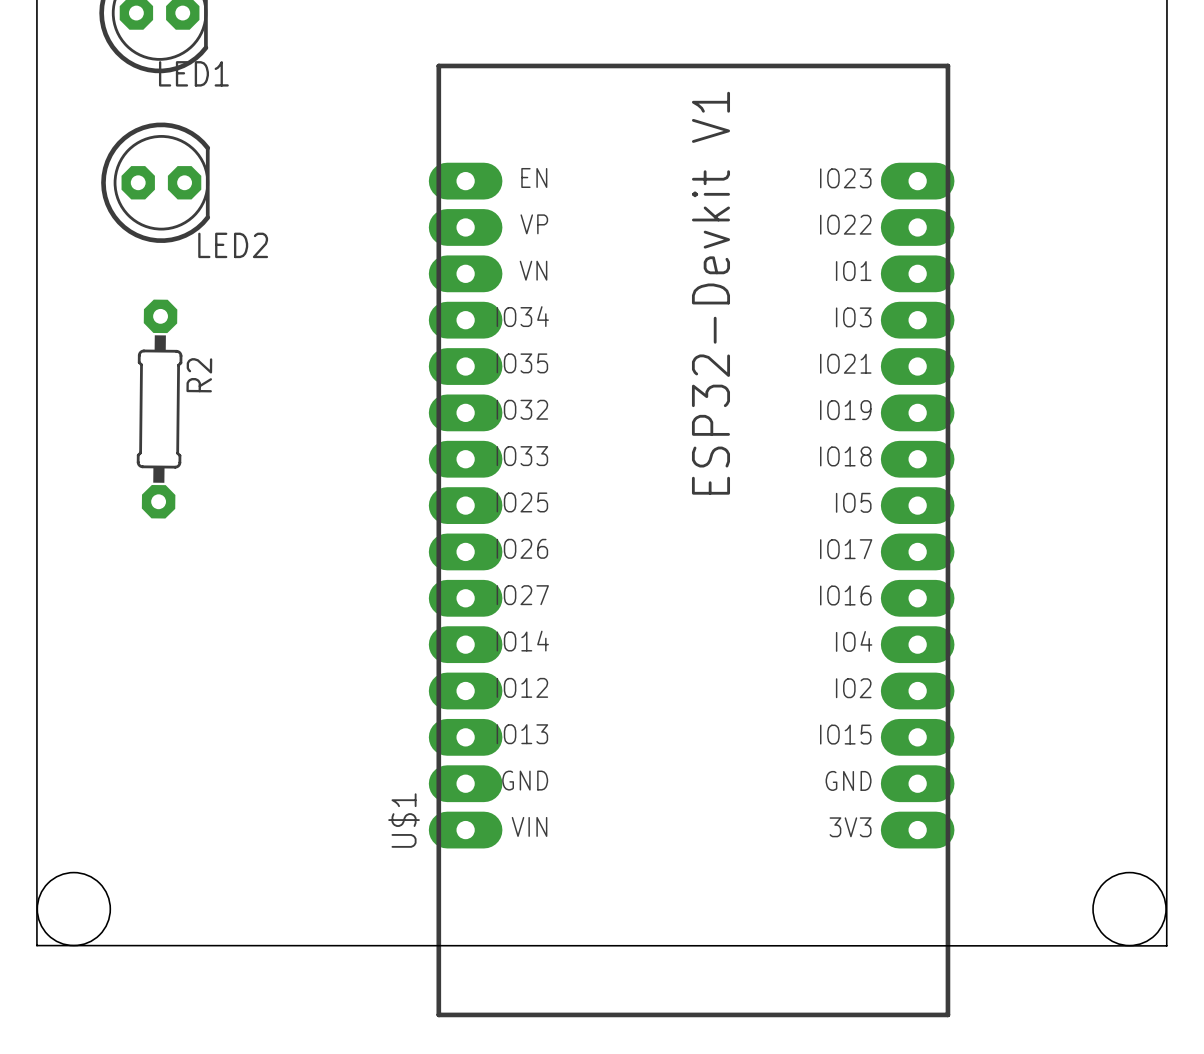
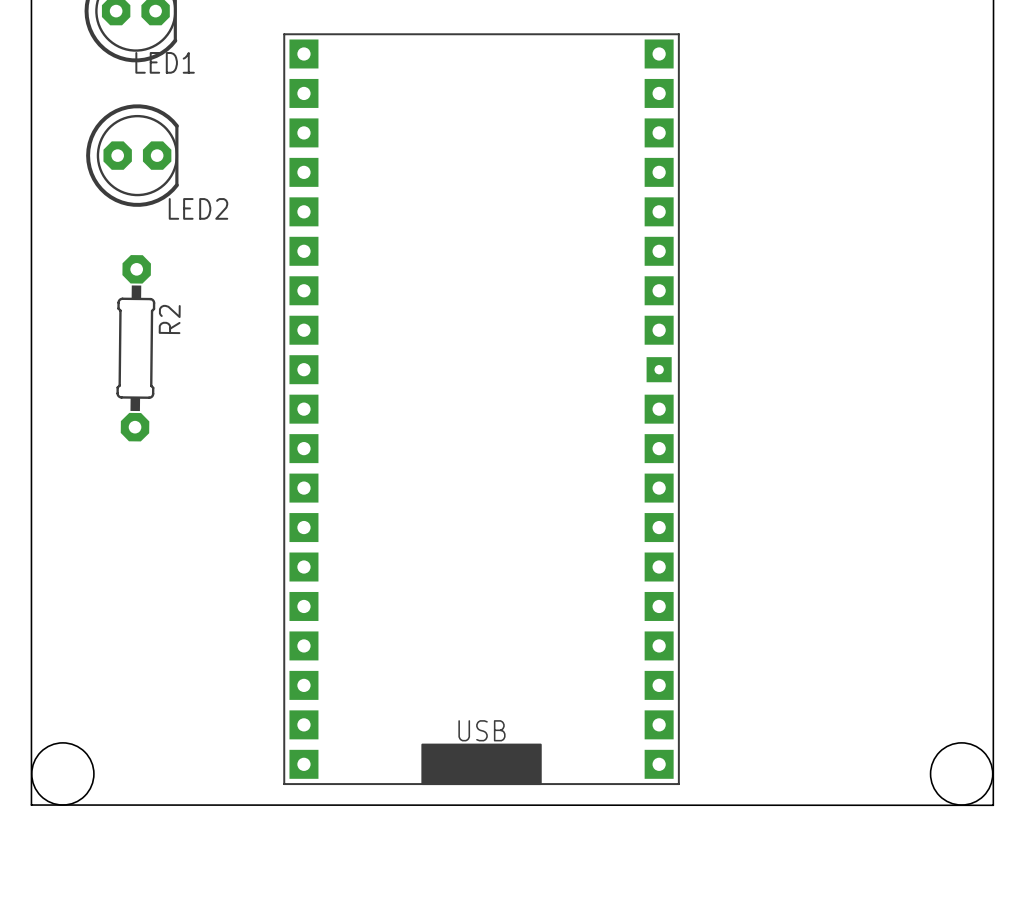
part: none -> (481, 409)
U$1: (691, 540) -> none

